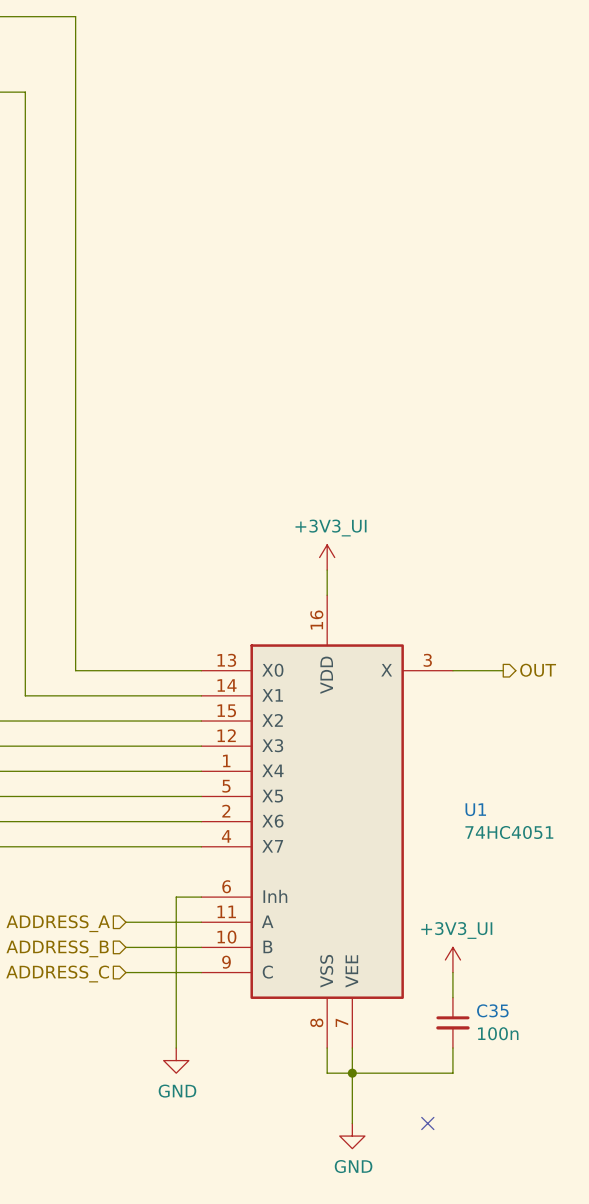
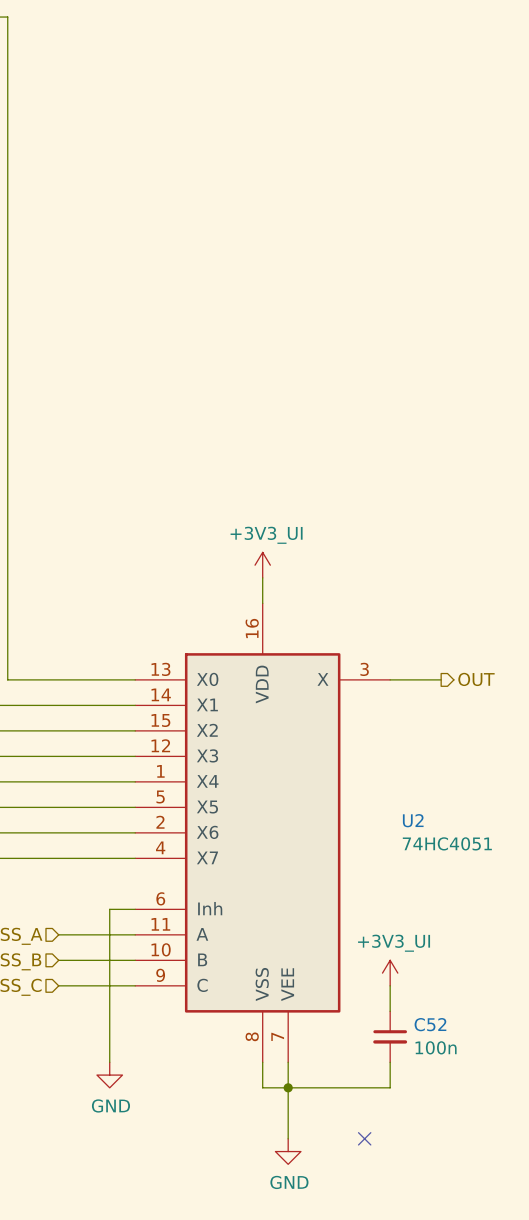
U1 name: U1 (475, 809) -> U2 (413, 820)
C35 name: C35 (492, 1010) -> C52 (430, 1024)

